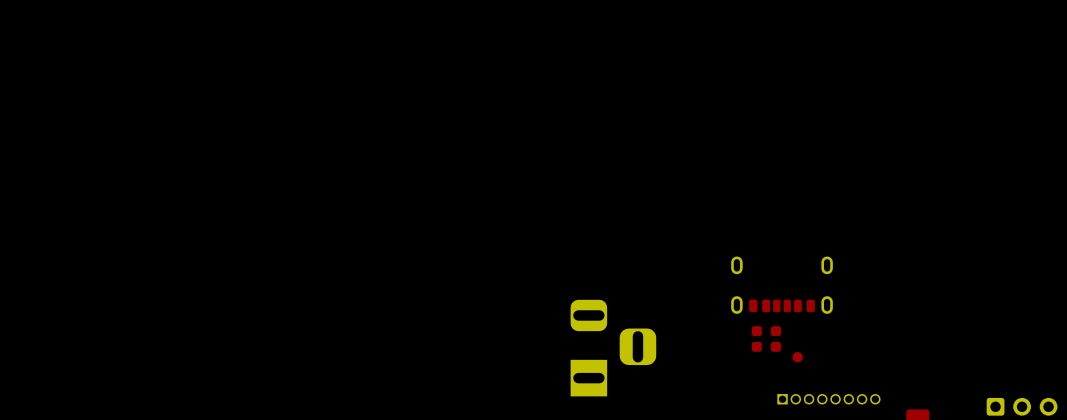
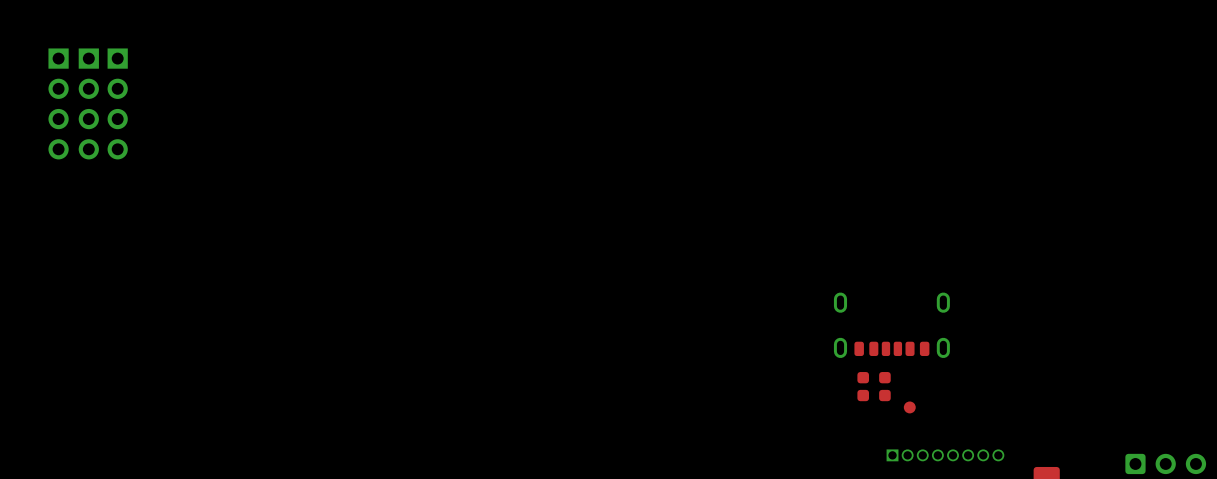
part: none -> (58, 103)
part: none -> (88, 103)
part: none -> (117, 103)
part: (613, 348) -> none

